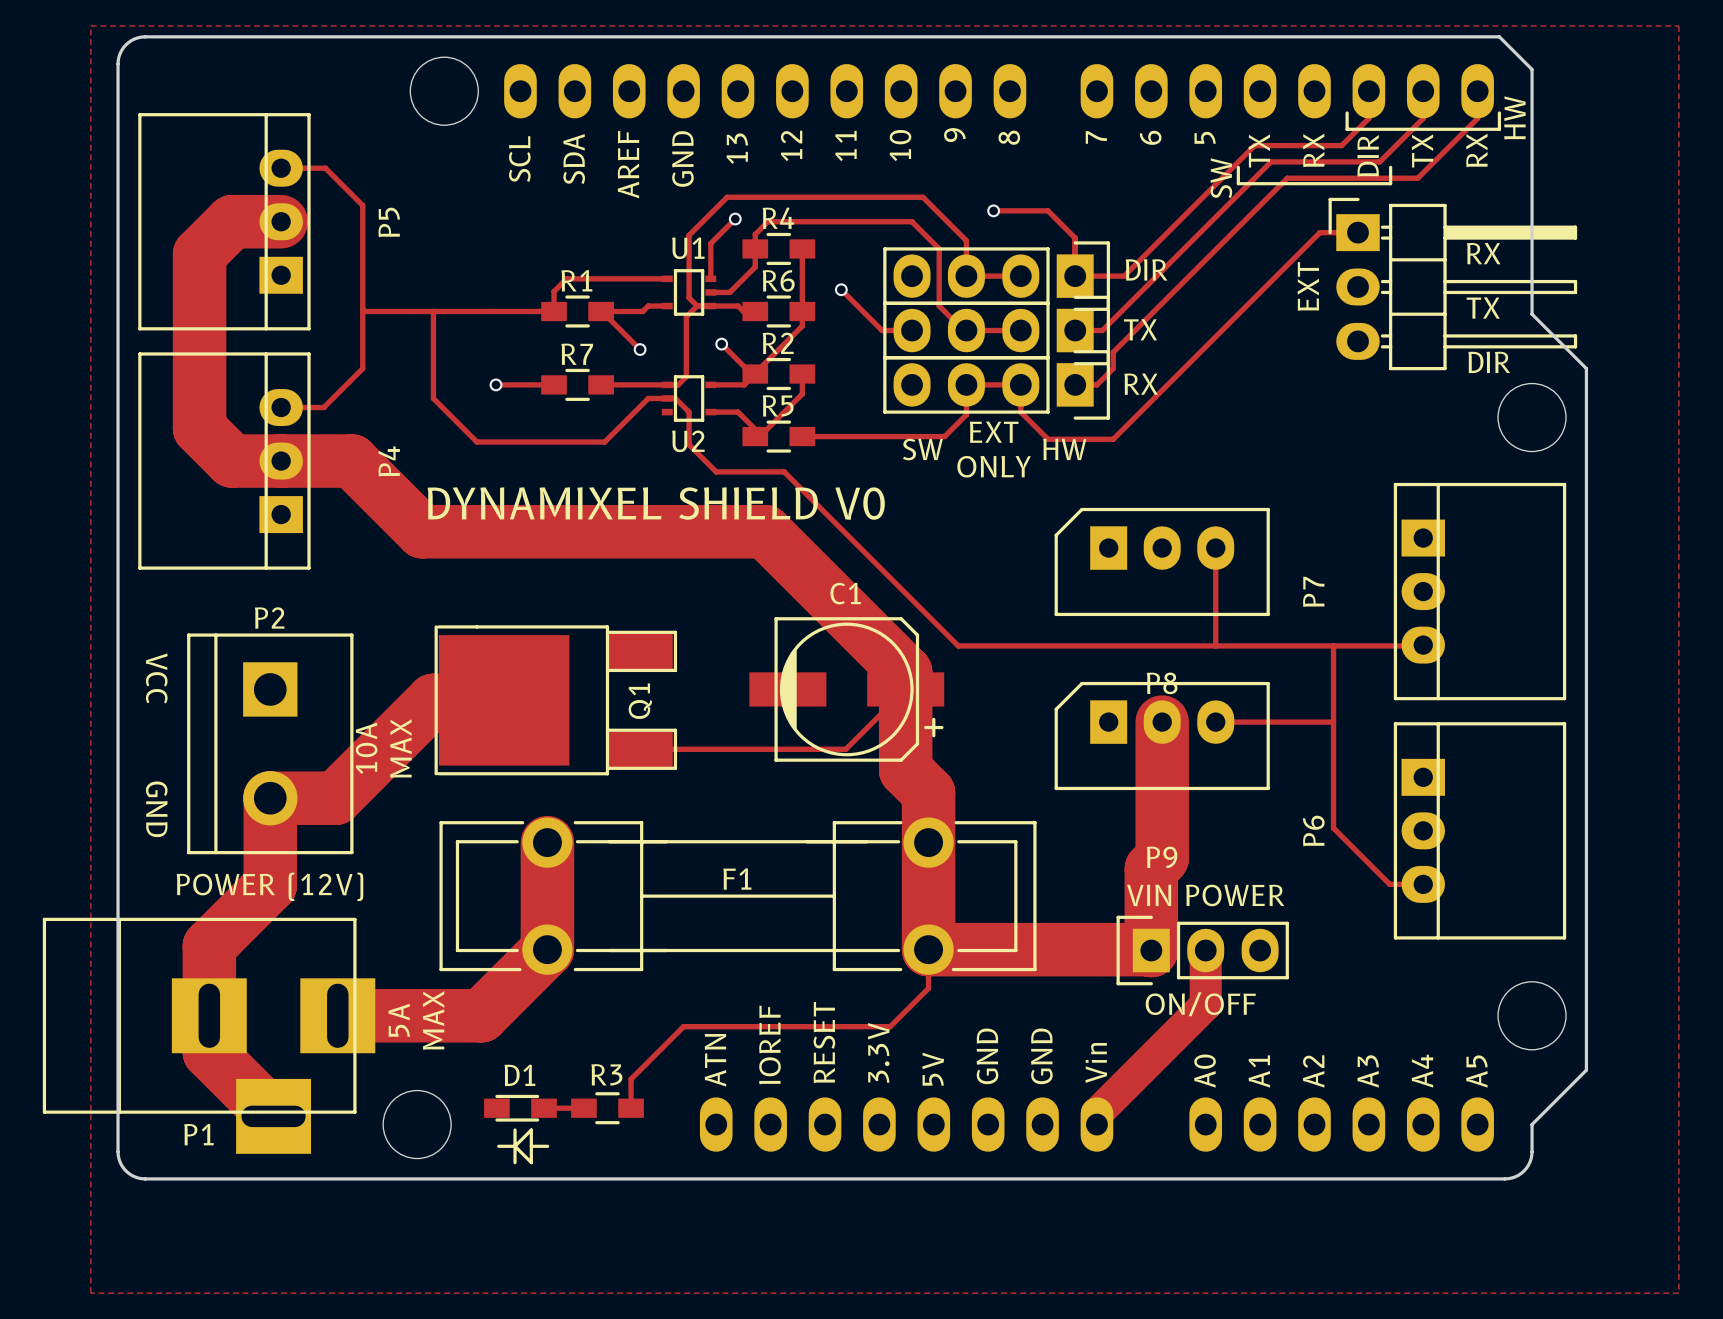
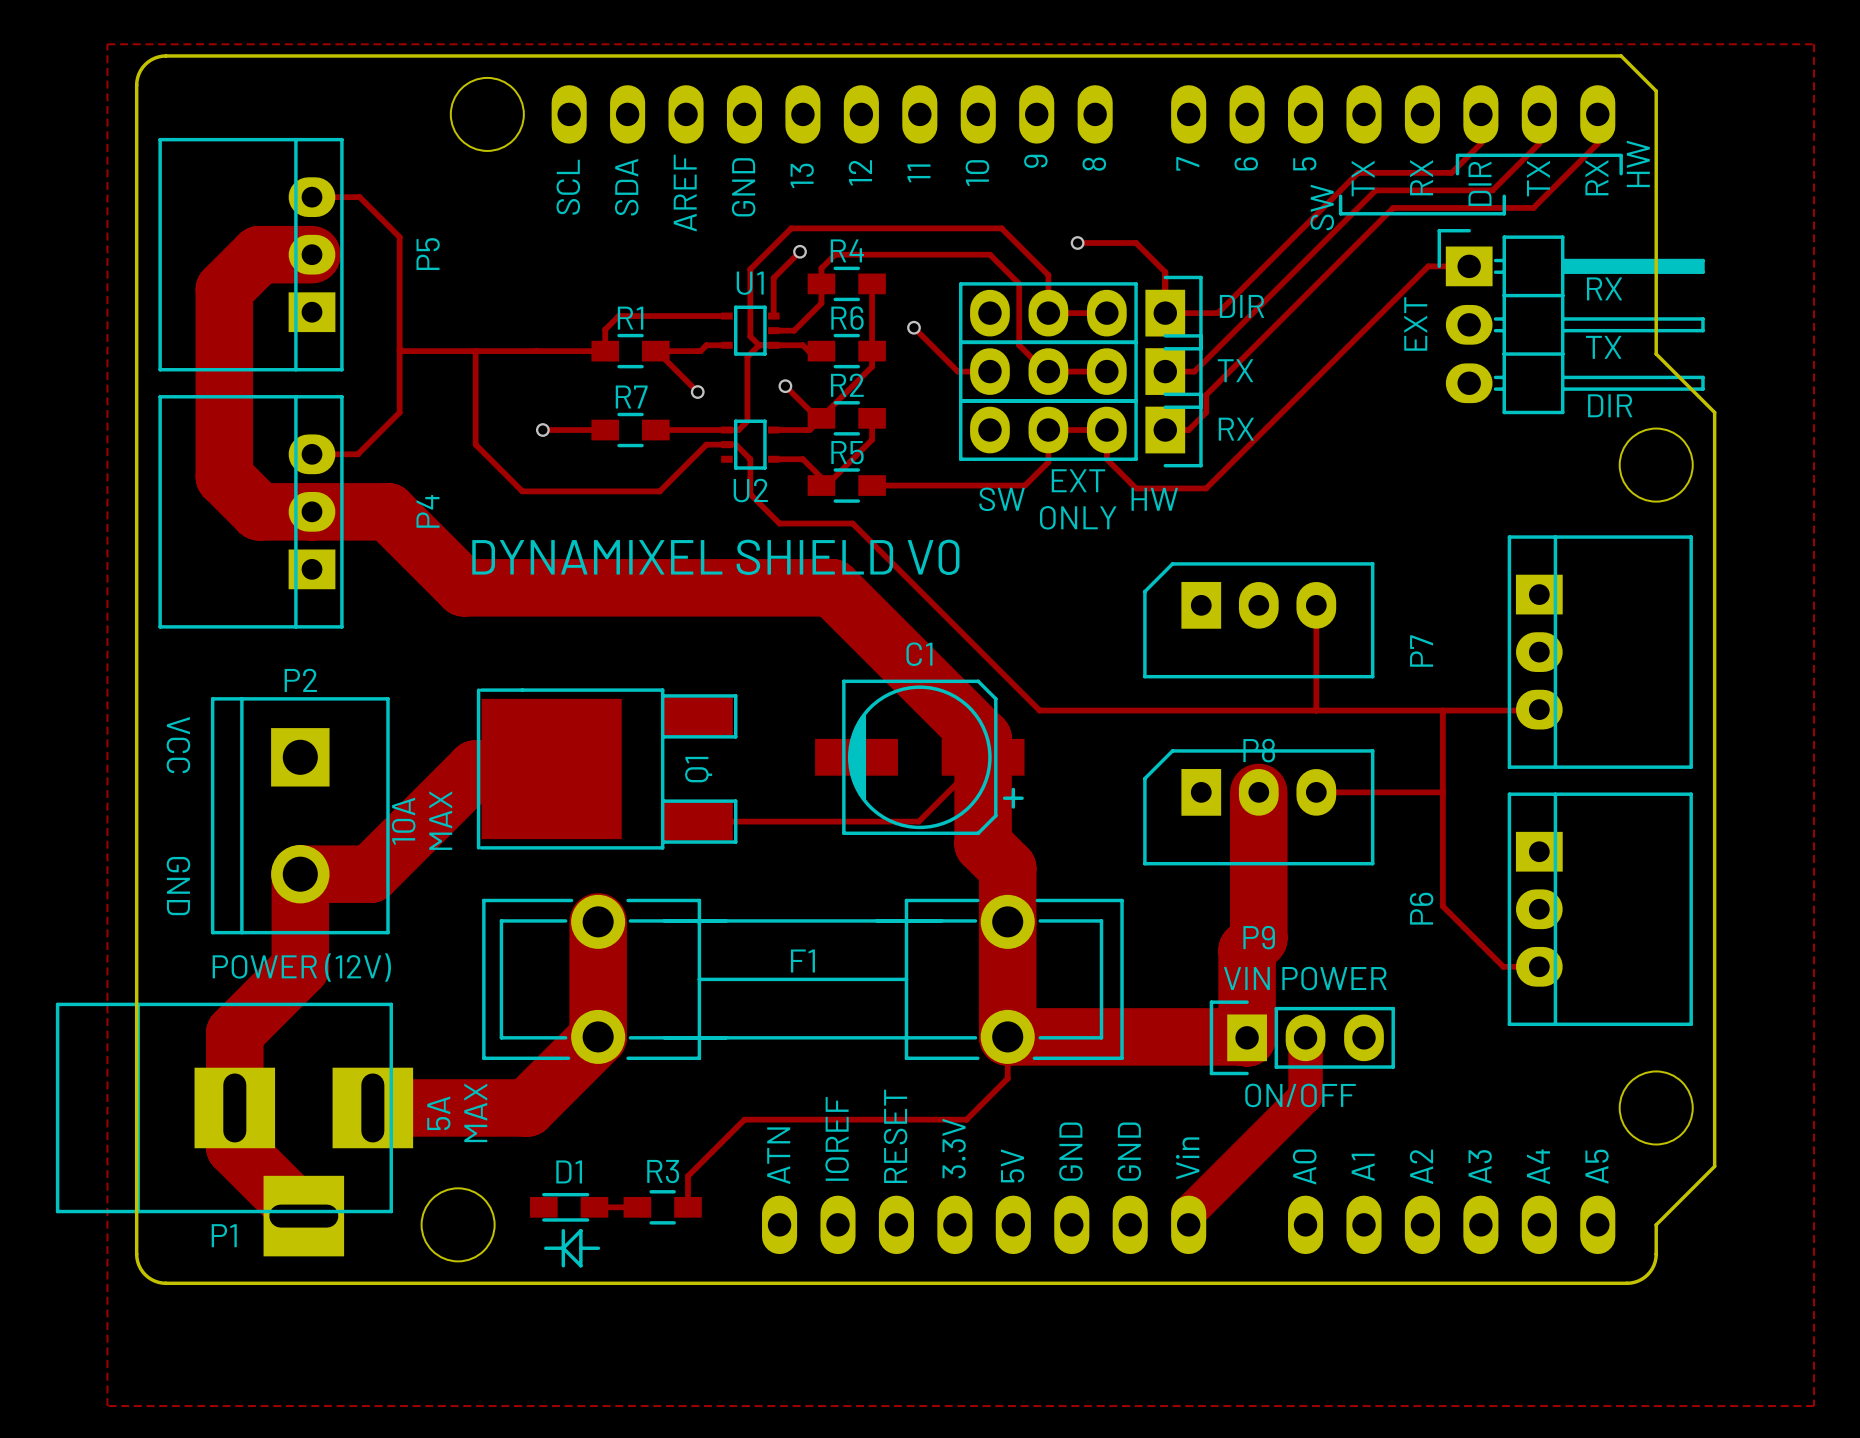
part footprint: [116, 35, 1589, 1181] -> [134, 54, 1717, 1286]

